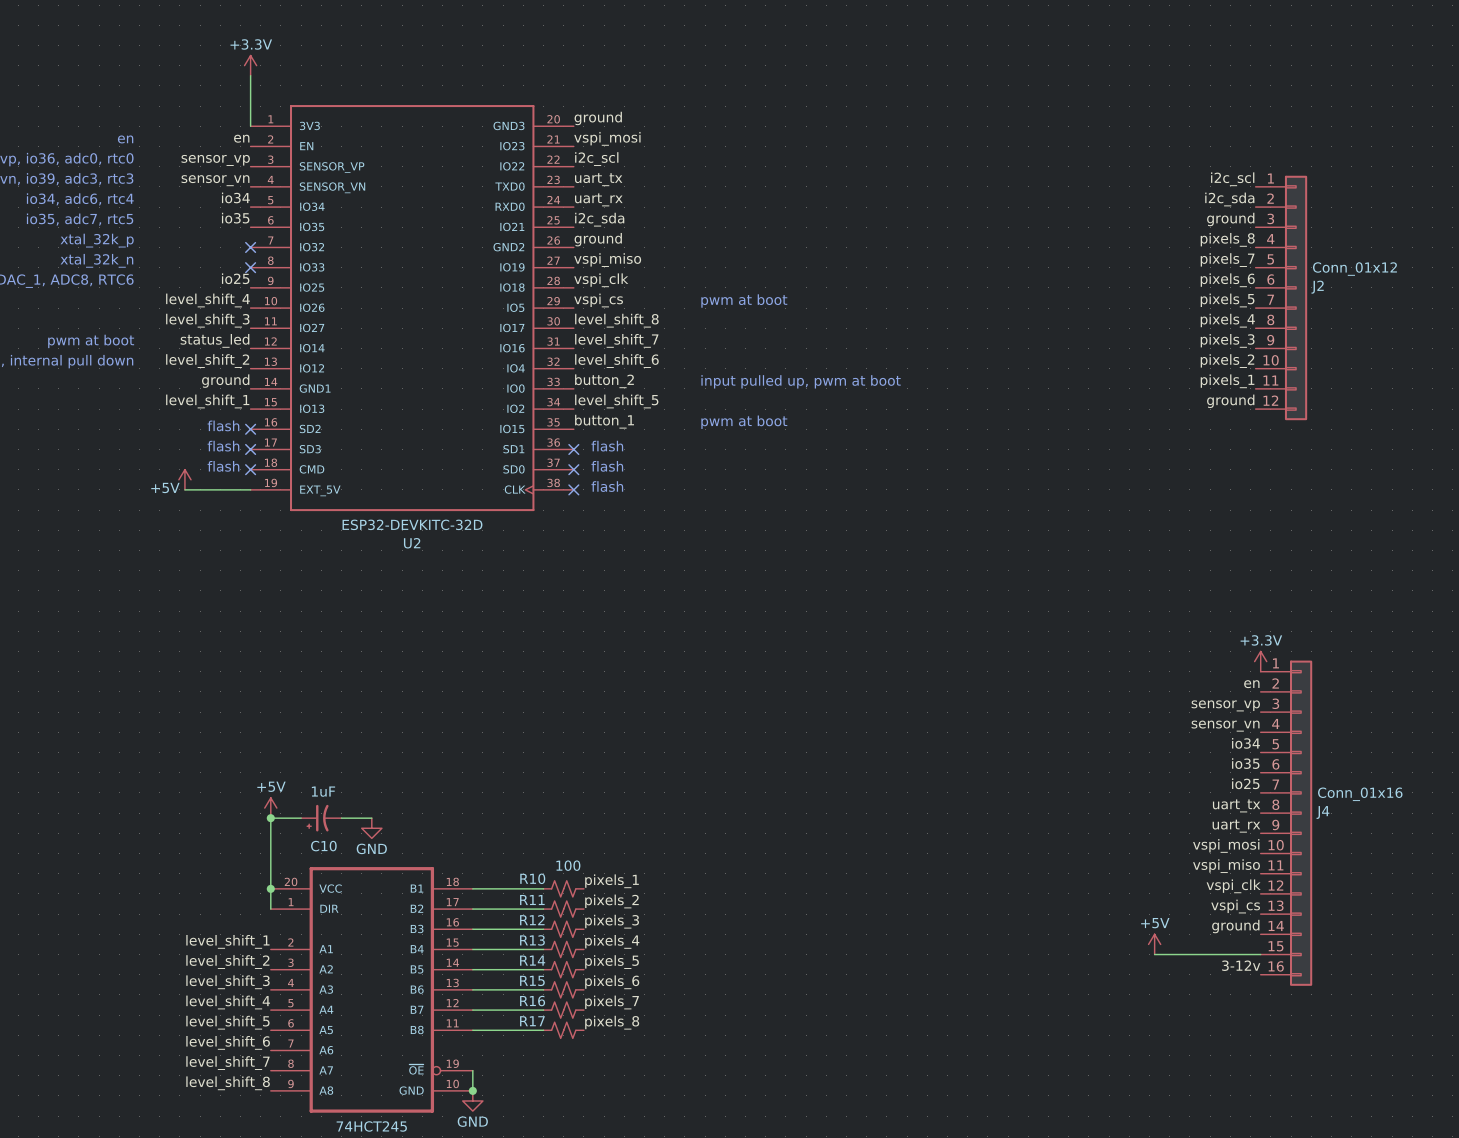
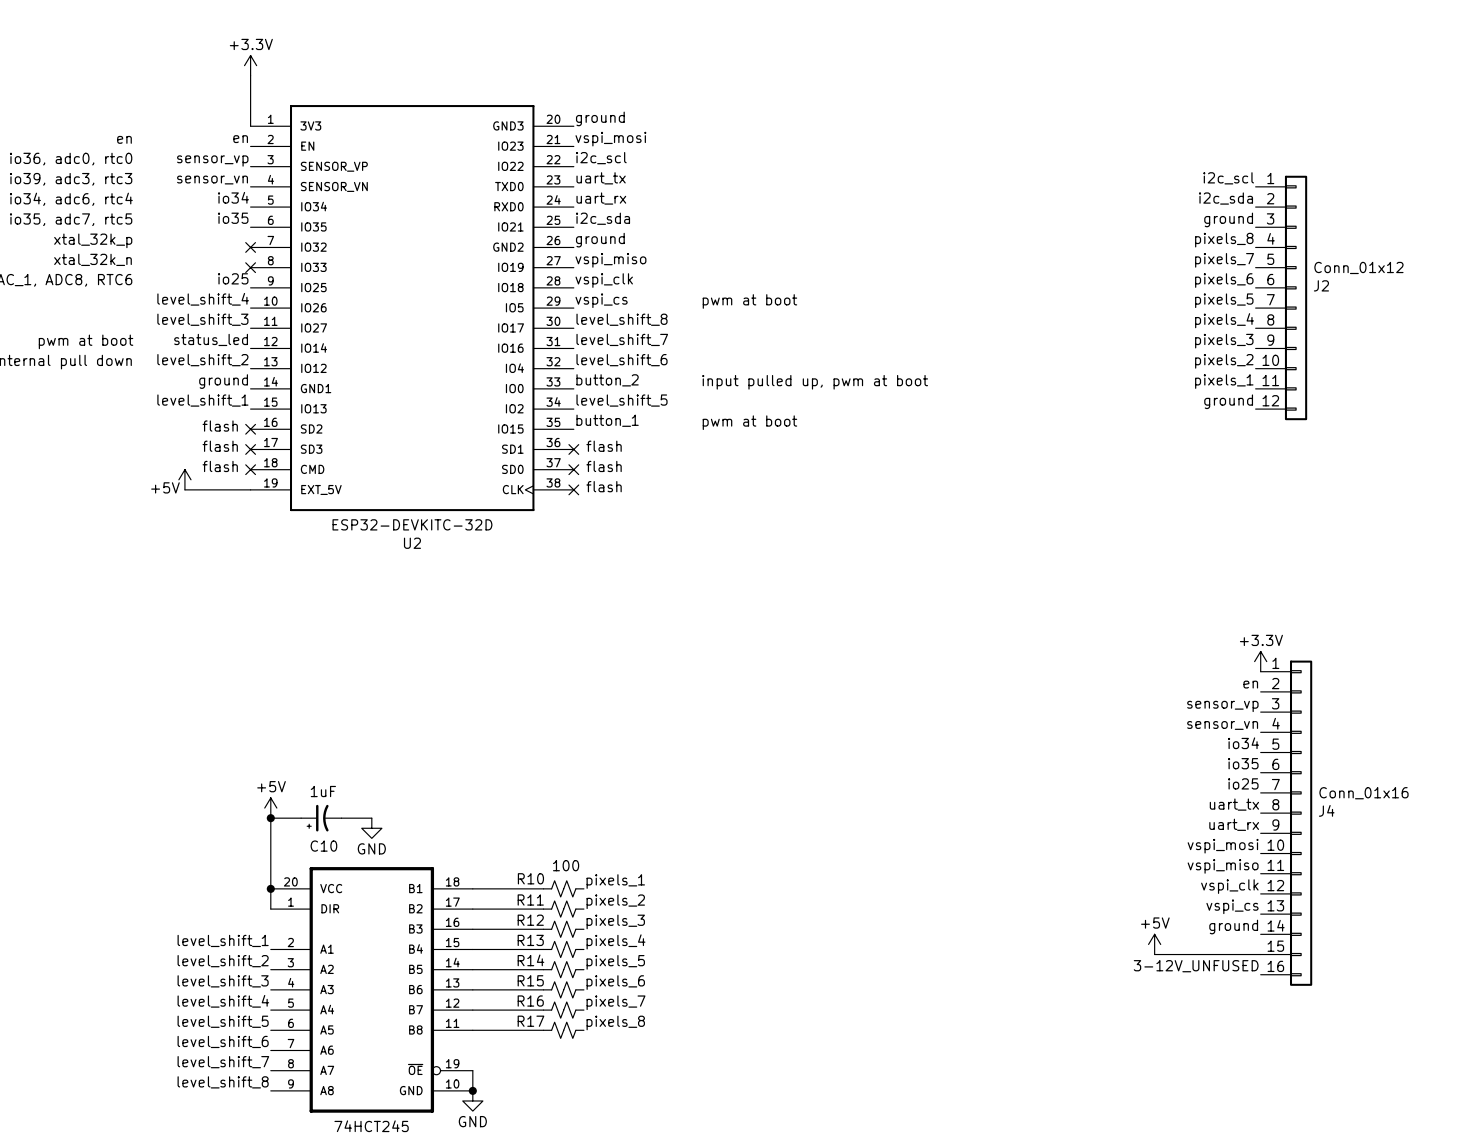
label: 3-12v (1241, 965) -> 3-12V_UNFUSED (1196, 966)

